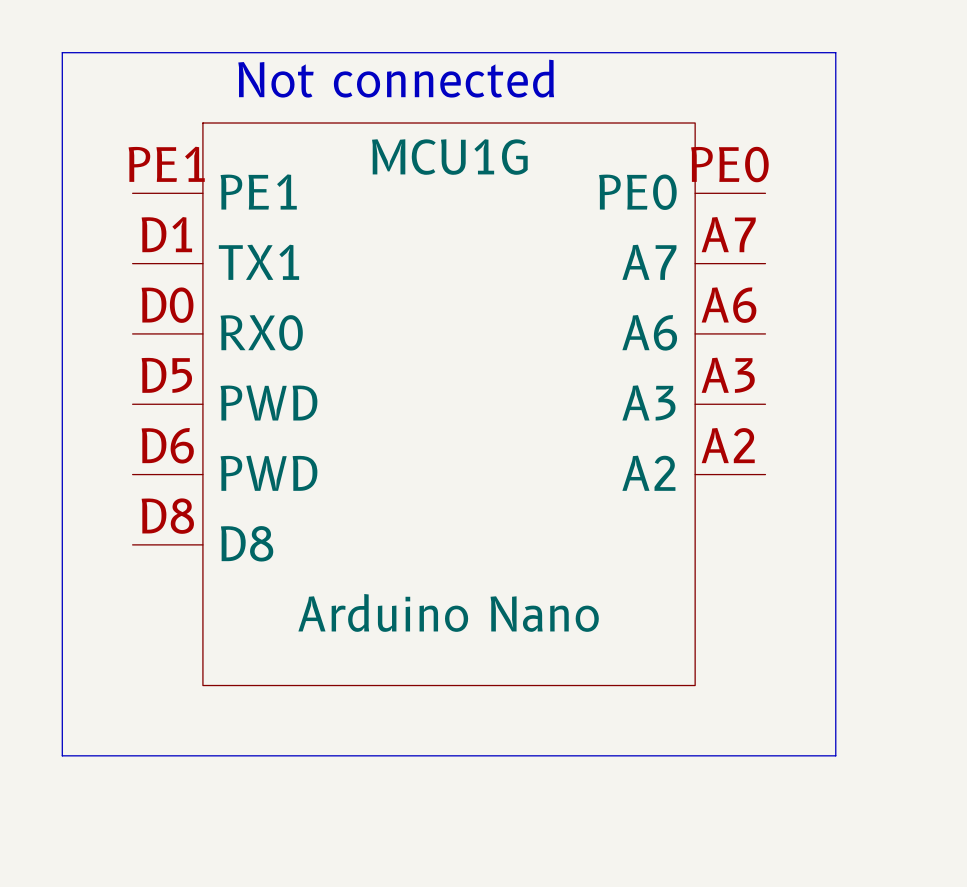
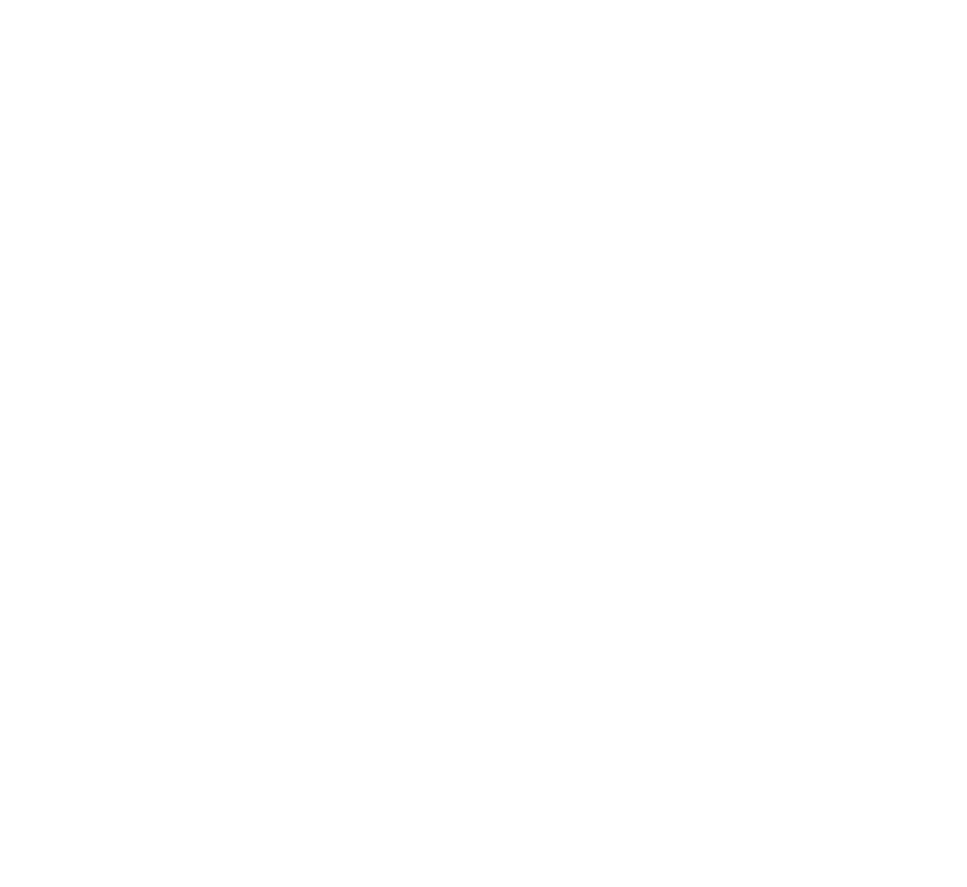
line: (62, 52) (835, 52) (835, 755) (62, 755) (62, 52) -> none
text: Not connected (396, 78) -> none
MCU1G: Arduino Nano (449, 404) -> none

